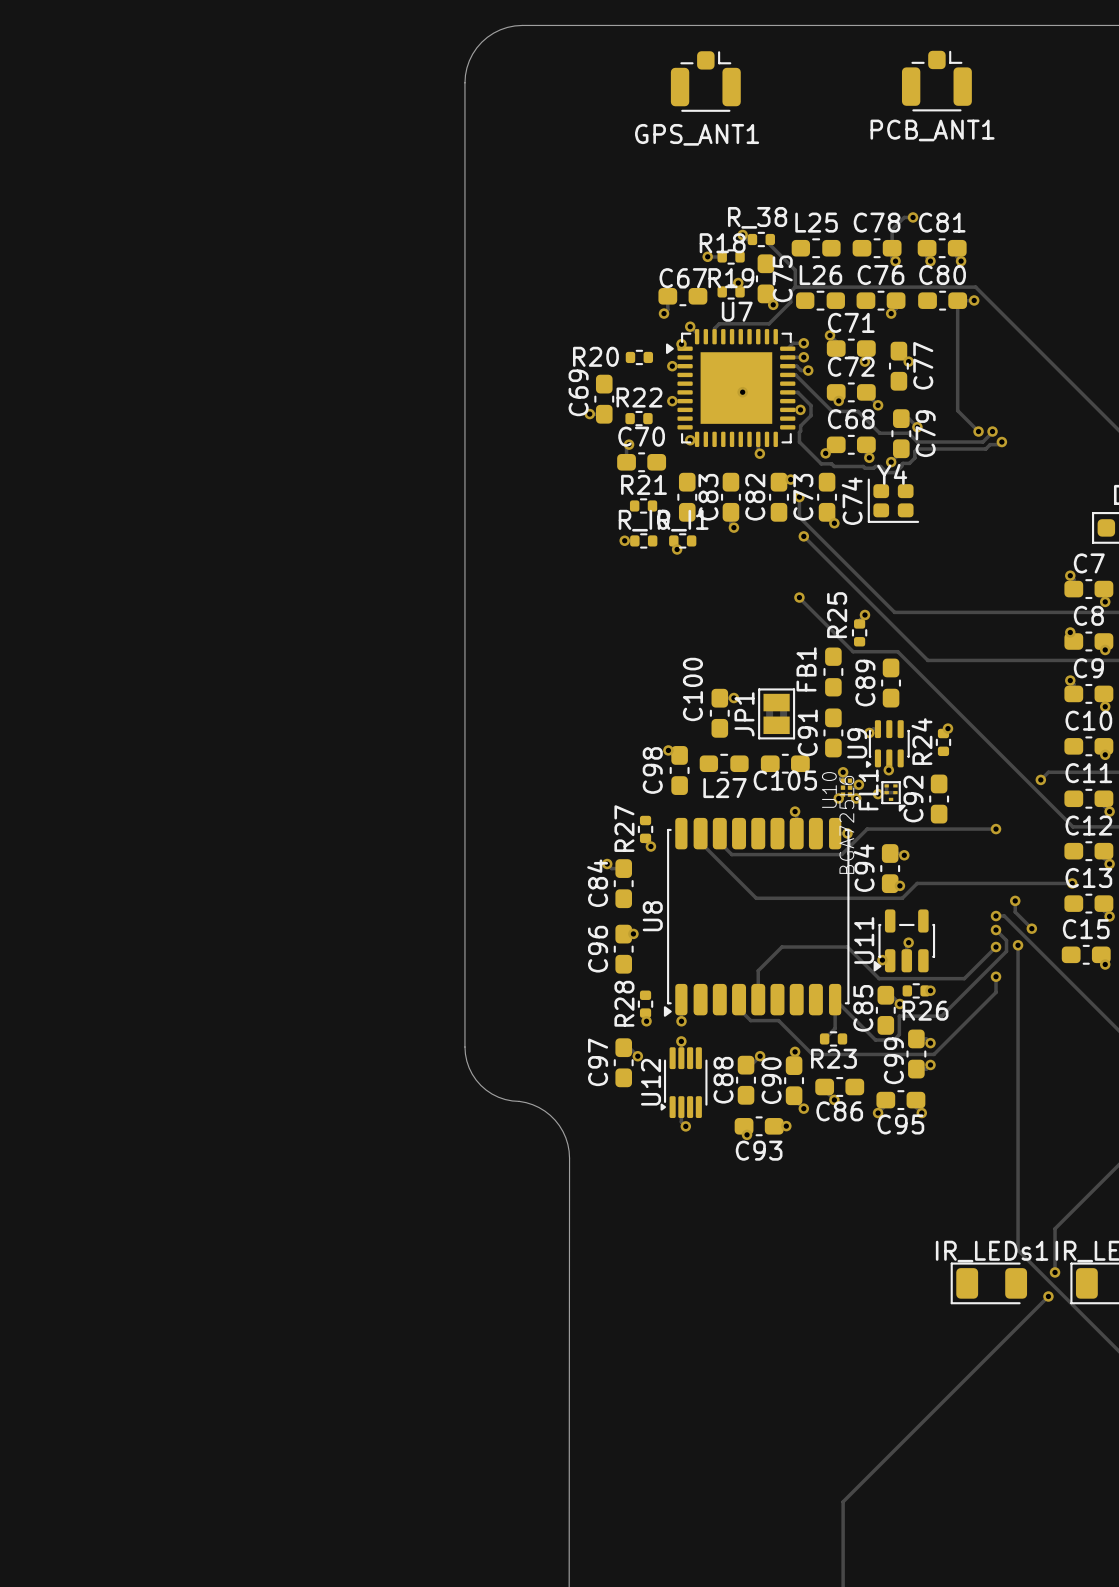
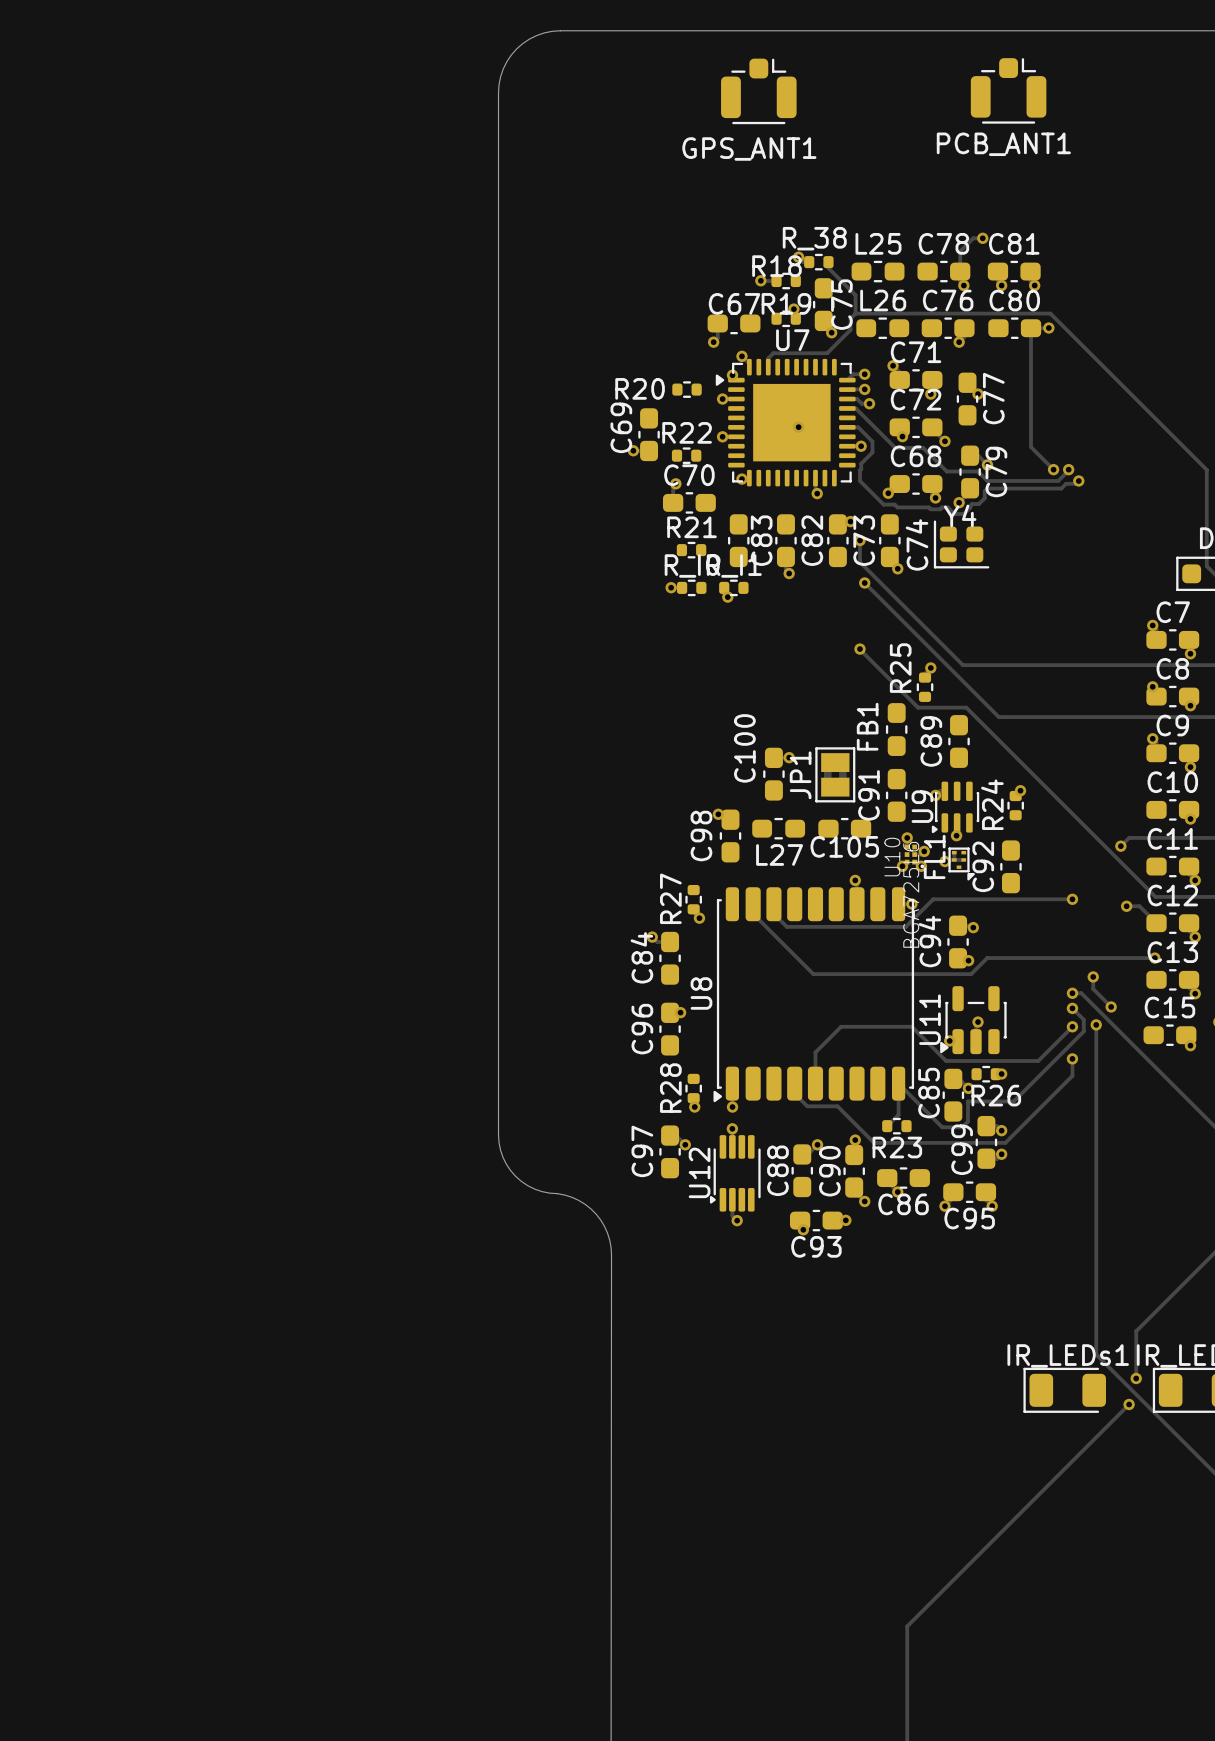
track: none -> (1126, 906) (1139, 906) (1156, 923)
via: none -> (1126, 906)

